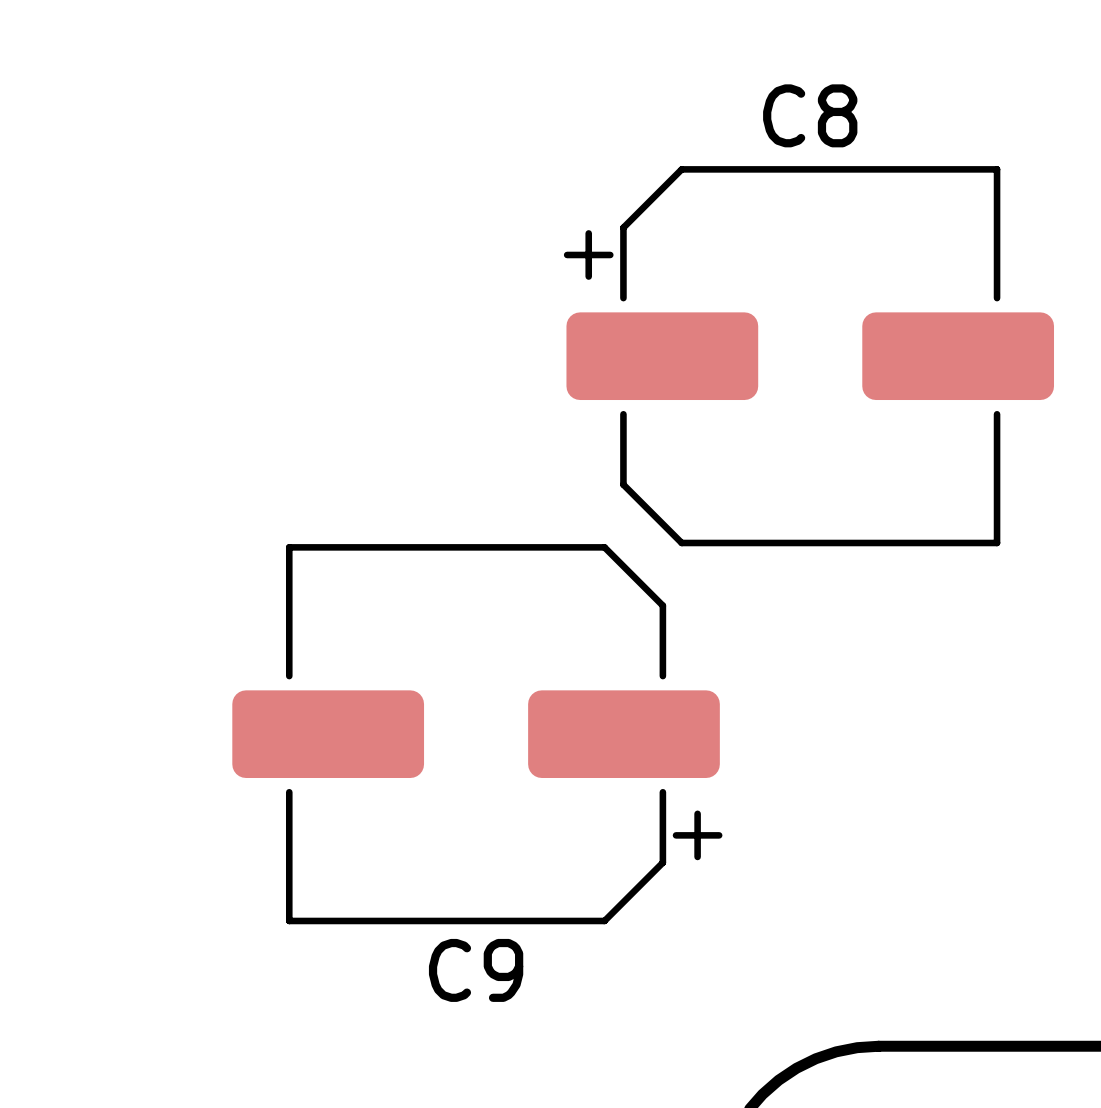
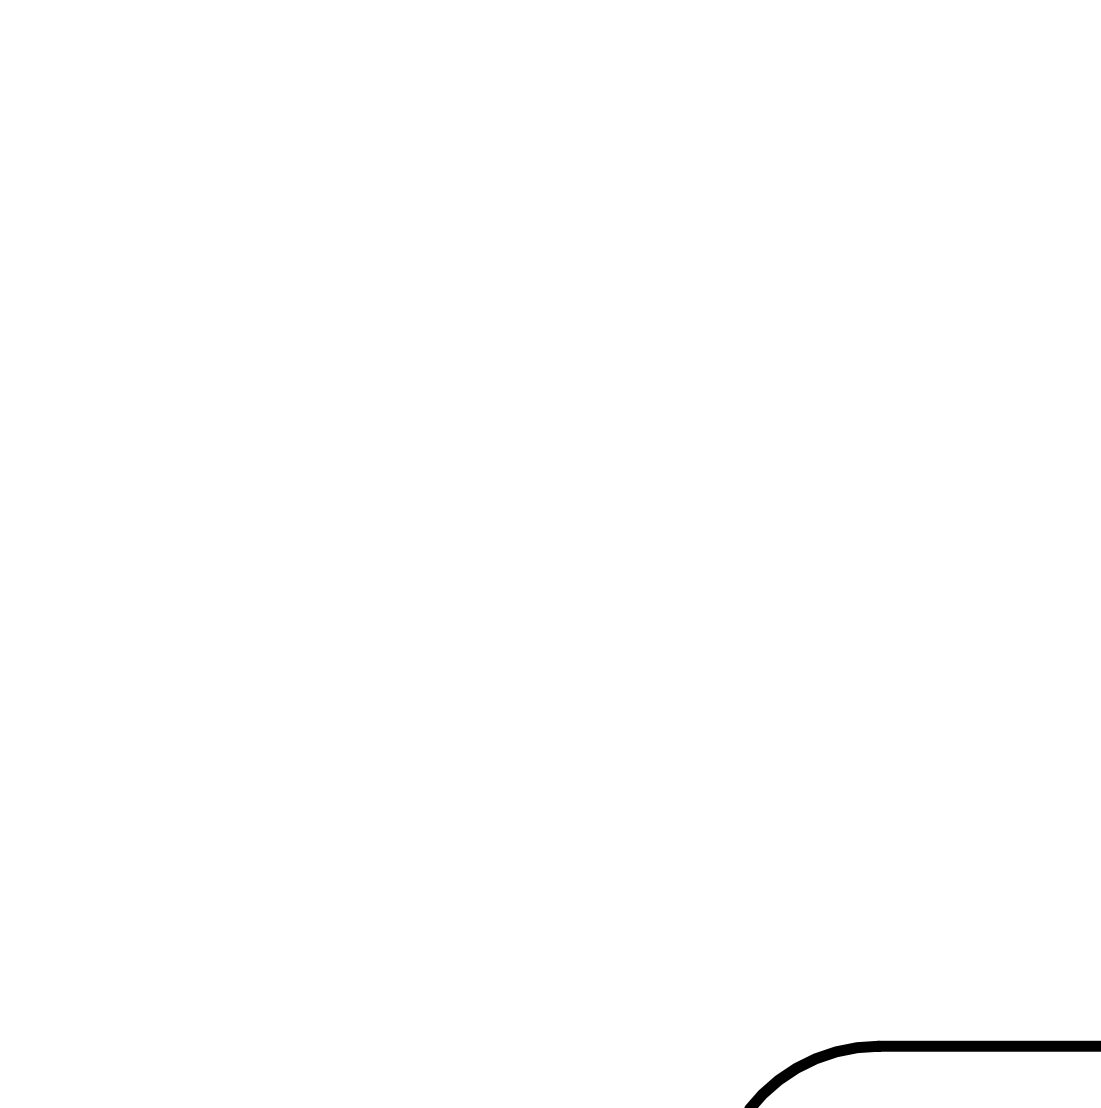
C8: (808, 356) -> none
C9: (477, 734) -> none

